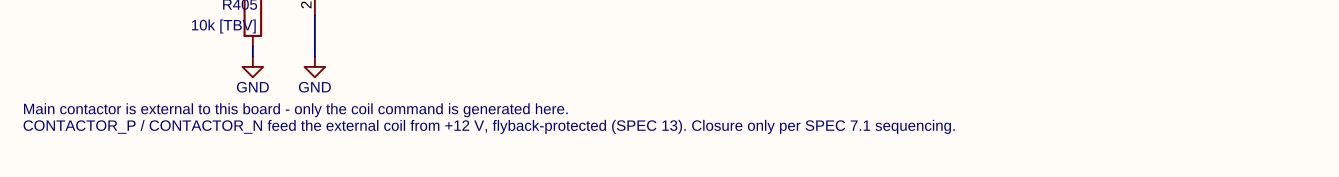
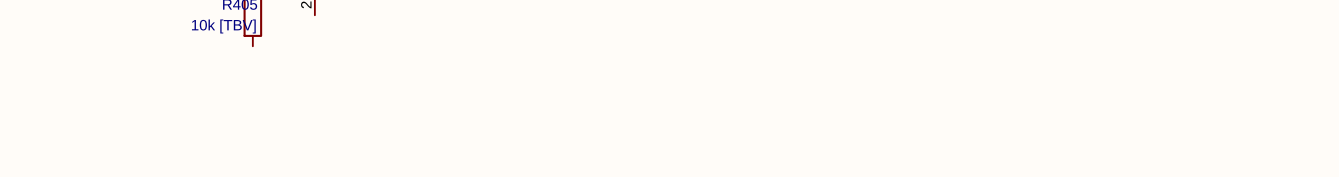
wire: (314, 15) (314, 56) -> none
wire: (252, 46) (252, 56) -> none
power symbol: GND (252, 66) -> none
power symbol: GND (314, 66) -> none
text: Main contactor is external to this board - only the coil command is generated here. (295, 110) -> none
text: CONTACTOR_P / CONTACTOR_N feed the external coil from +12 V, flyback-protected (SPEC 13). Closure only per SPEC 7.1 sequencing. (489, 126) -> none

